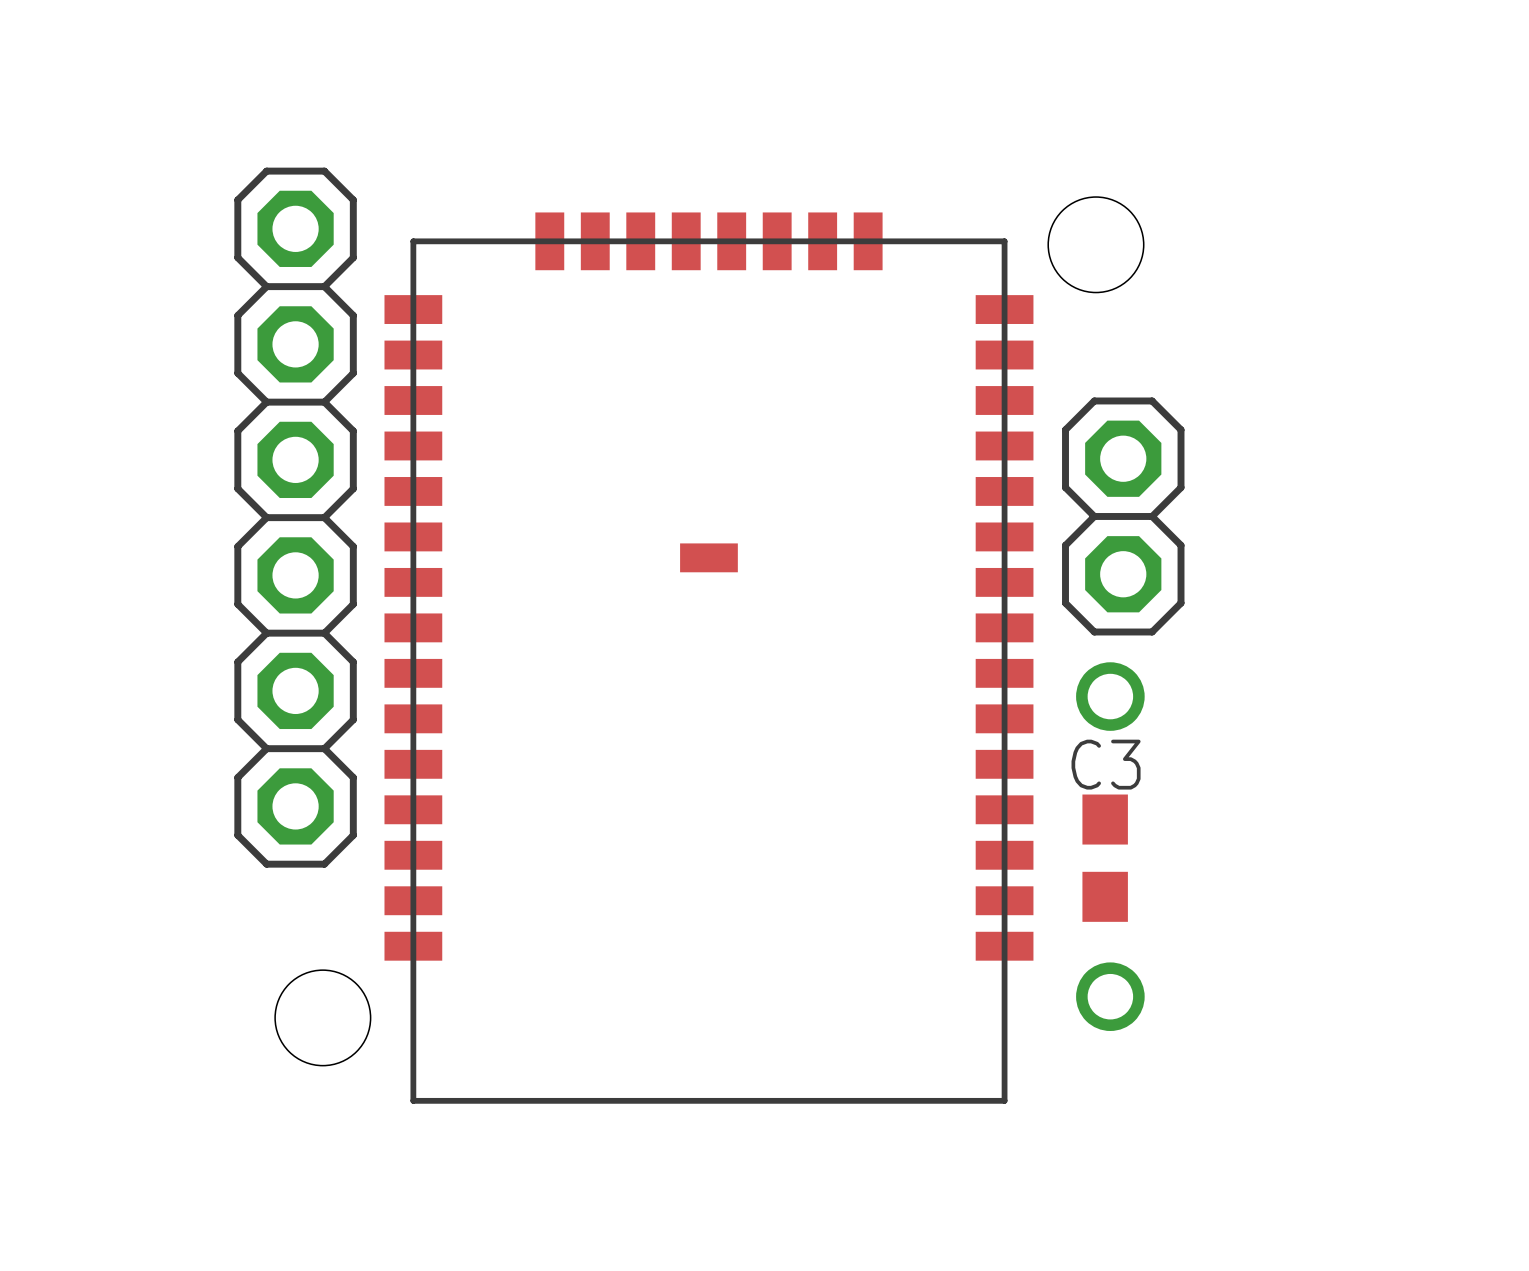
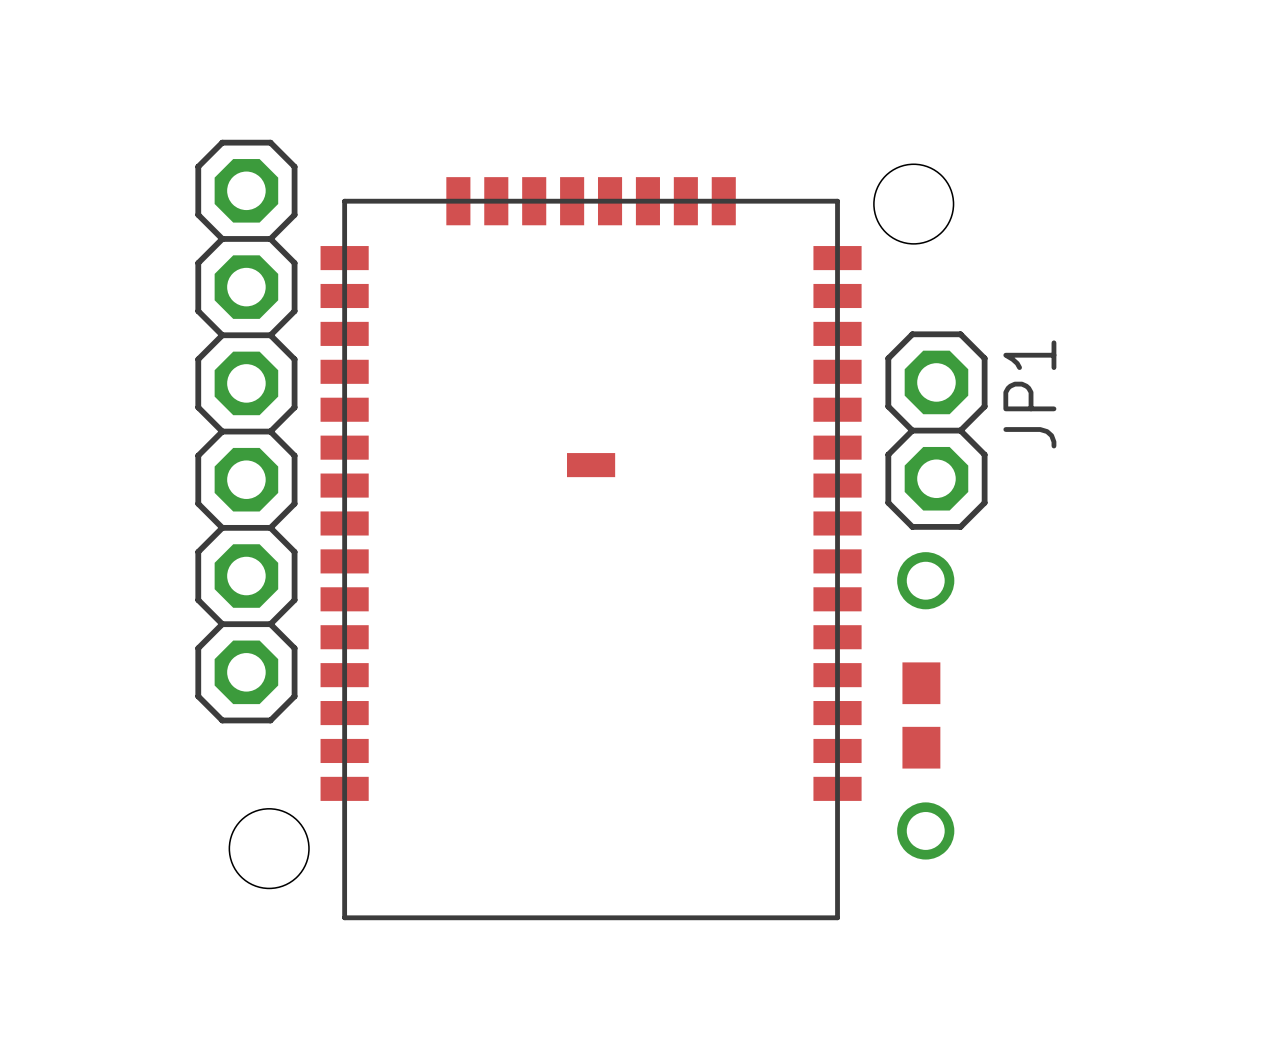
JP1 name: none -> JP1 (1029, 394)
C3 name: C3 (1106, 764) -> none

